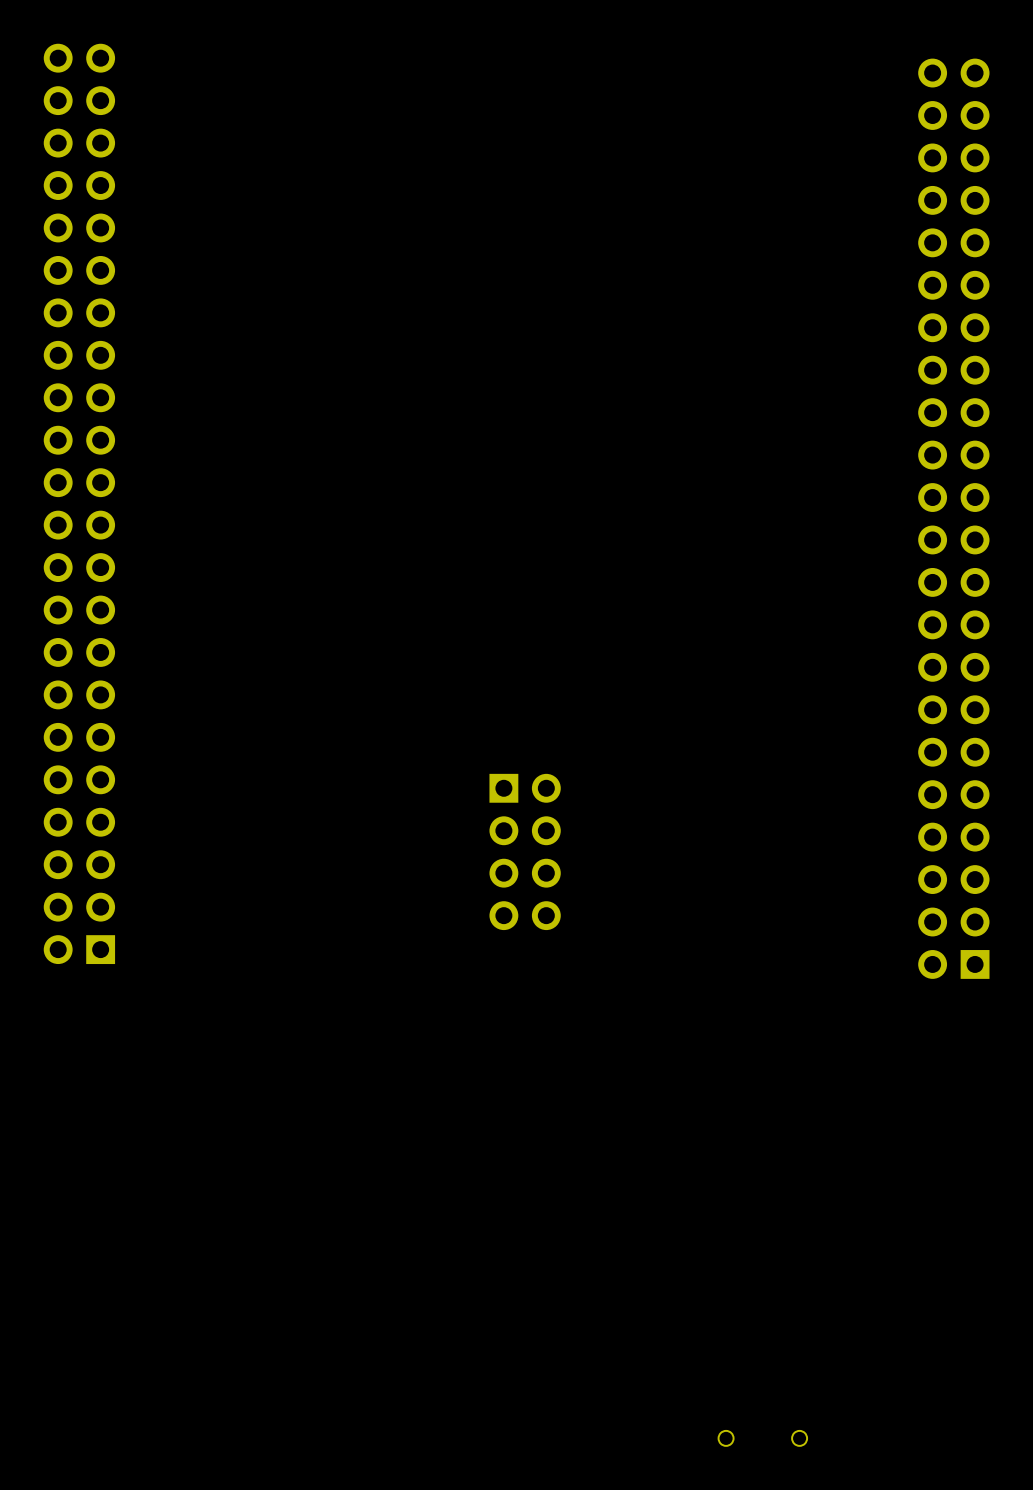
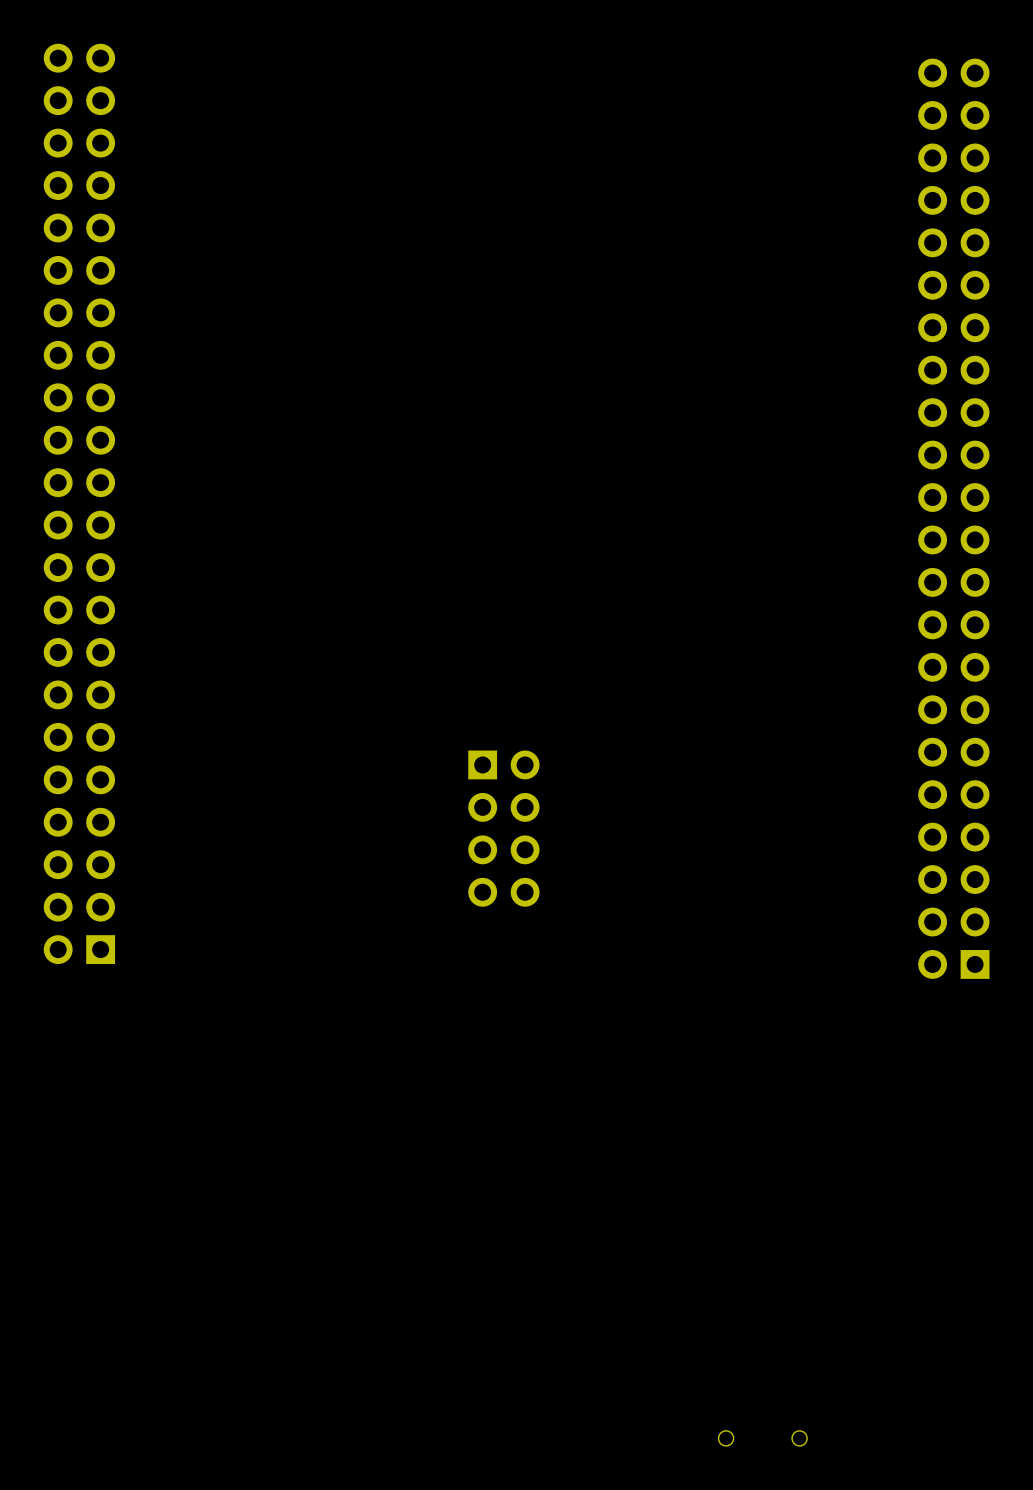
part position: (525, 851) -> (503, 828)

